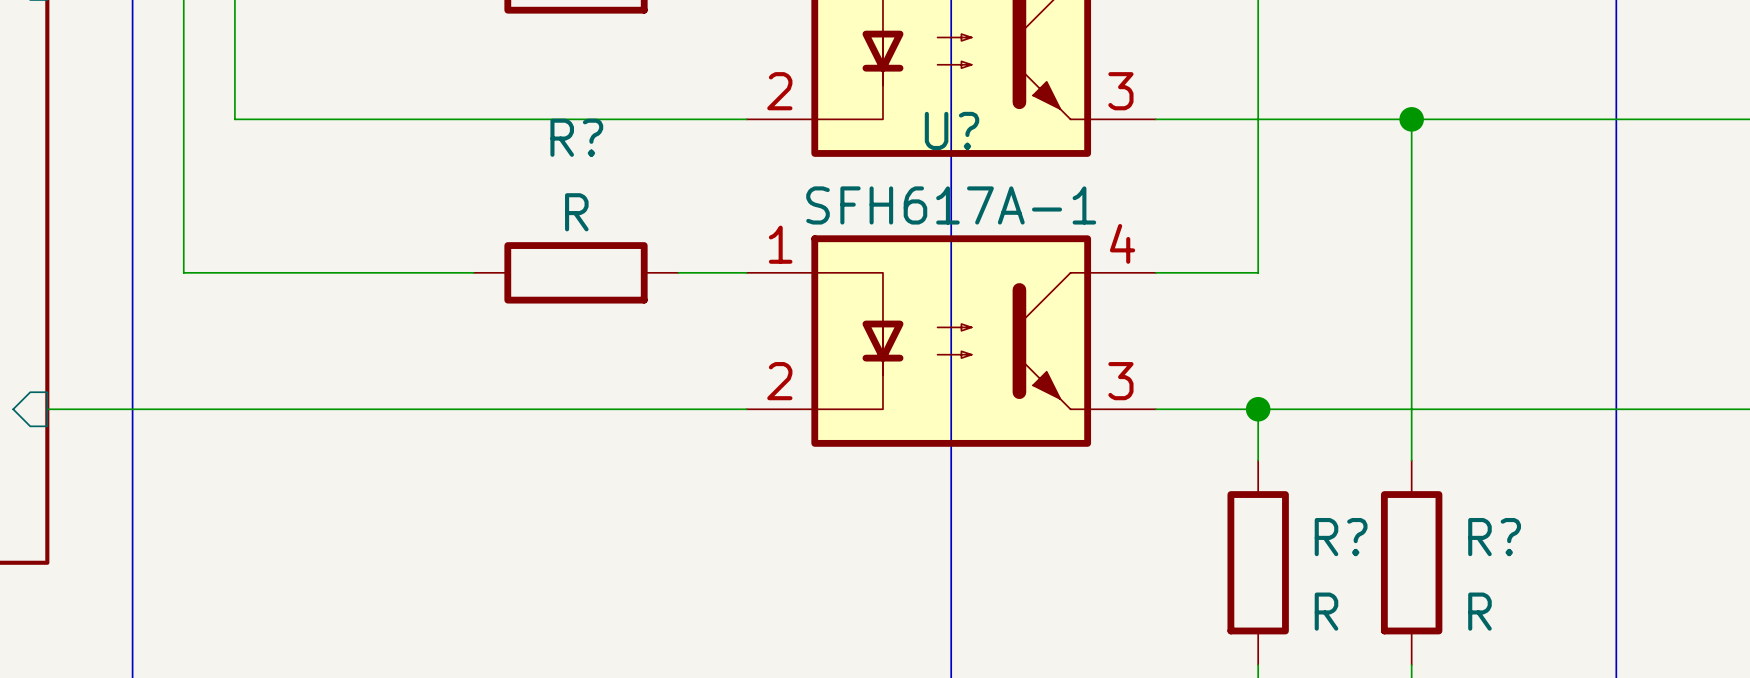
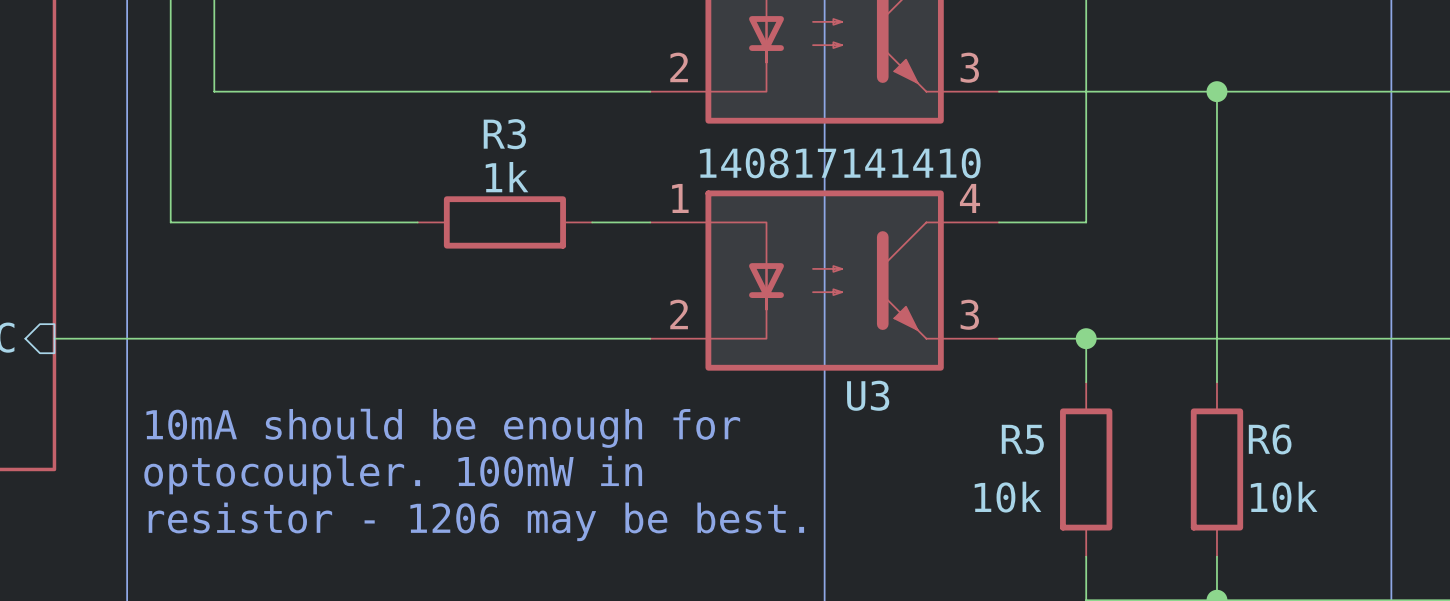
U? name: U? (952, 130) -> U3 (868, 395)
R? name: R? (576, 137) -> R3 (504, 134)
U? value: SFH617A-1 (951, 205) -> 140817141410 (840, 163)
R? value: R (576, 212) -> 1k (507, 177)
text: none -> 10mA should be enough for (443, 428)
R? name: R? (1341, 537) -> R5 (1022, 439)
R? name: R? (1494, 537) -> R6 (1270, 439)
text: none -> optocoupler. 100mW in (393, 474)
R? value: R (1326, 611) -> 10k (1008, 497)
R? value: R (1479, 611) -> 10k (1284, 497)
text: none -> resistor - 1206 may be best. (476, 521)

